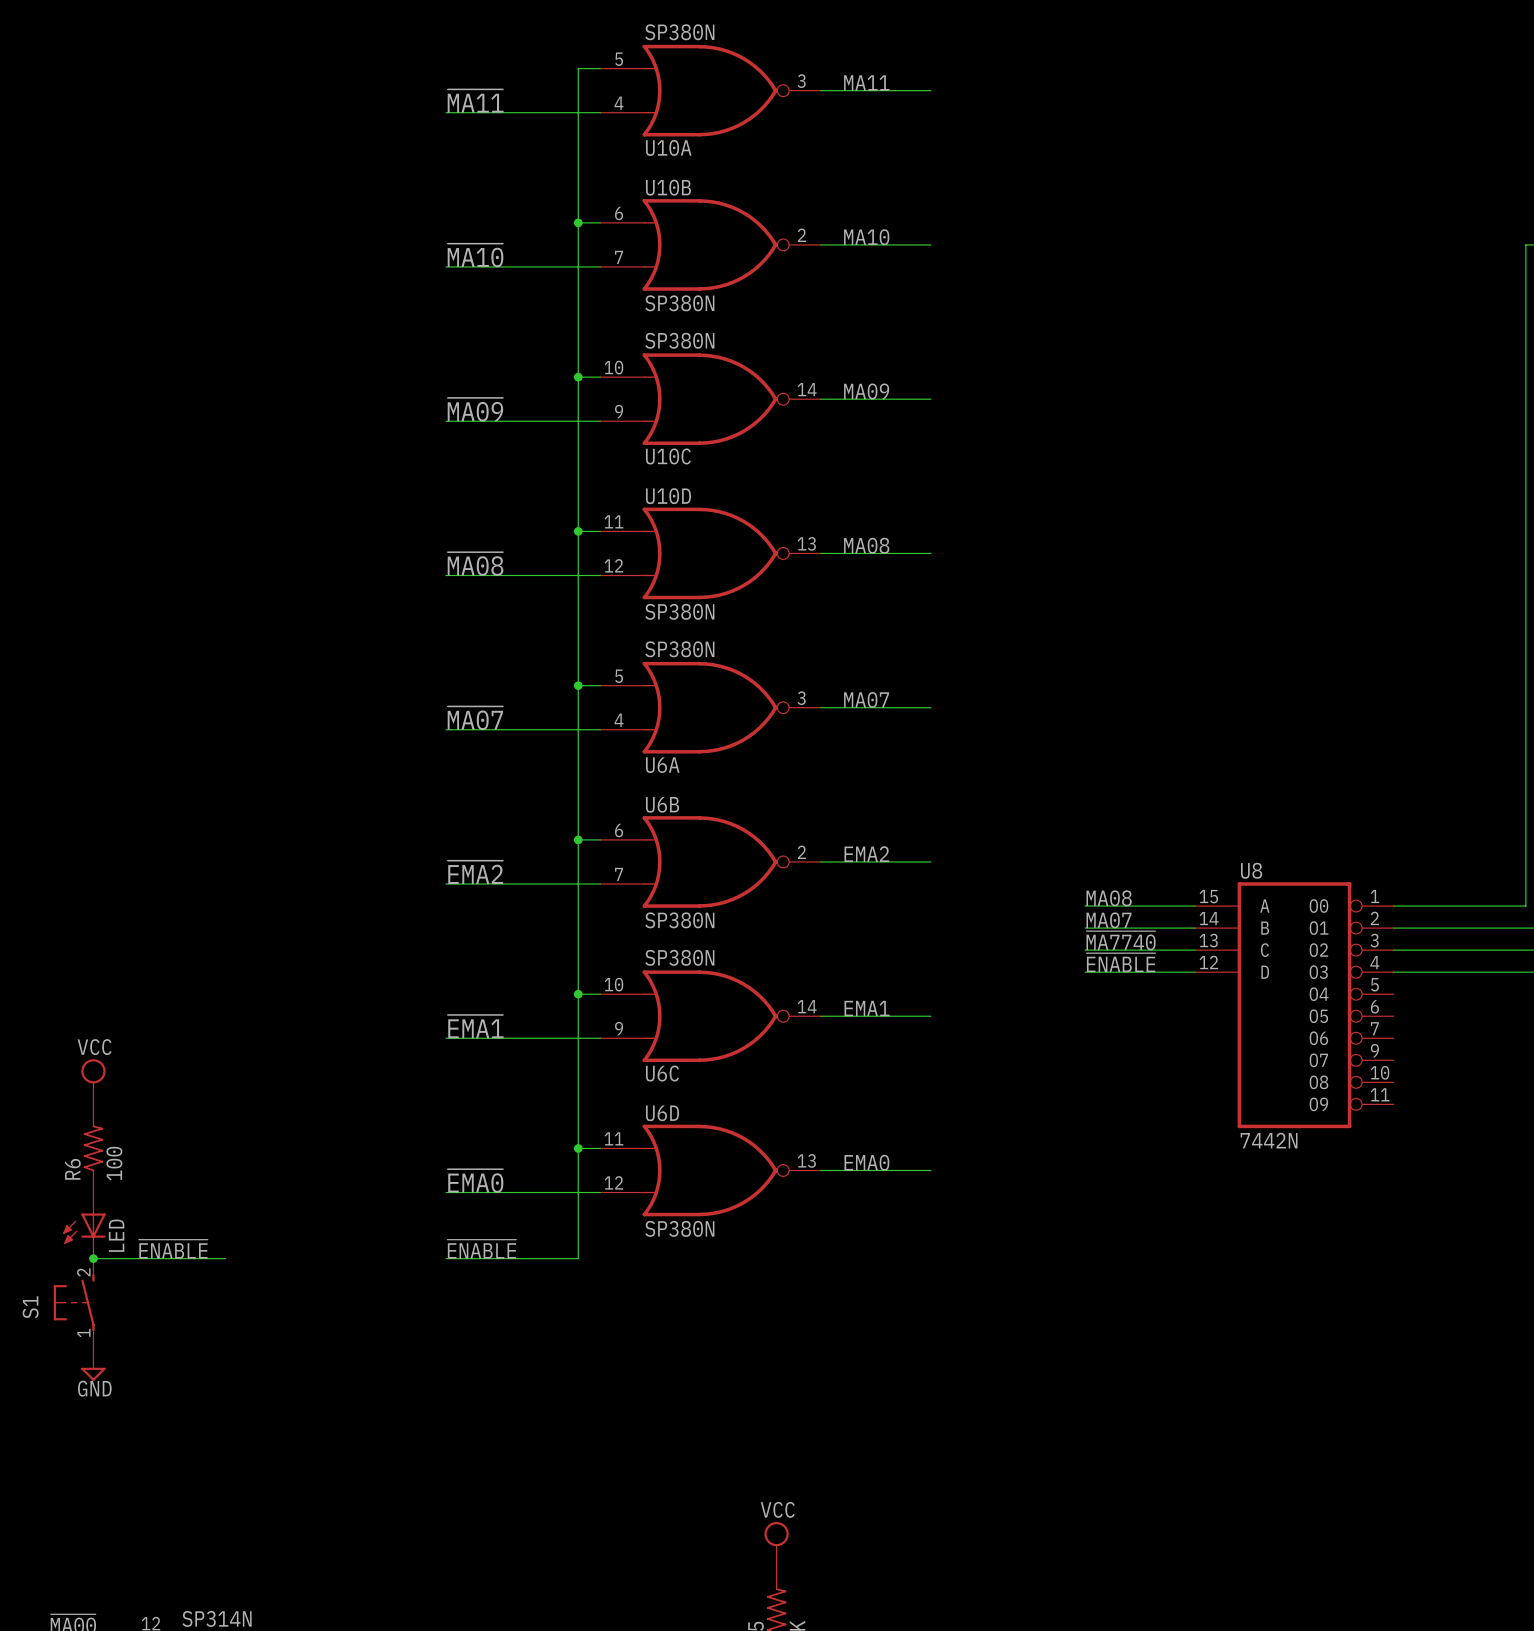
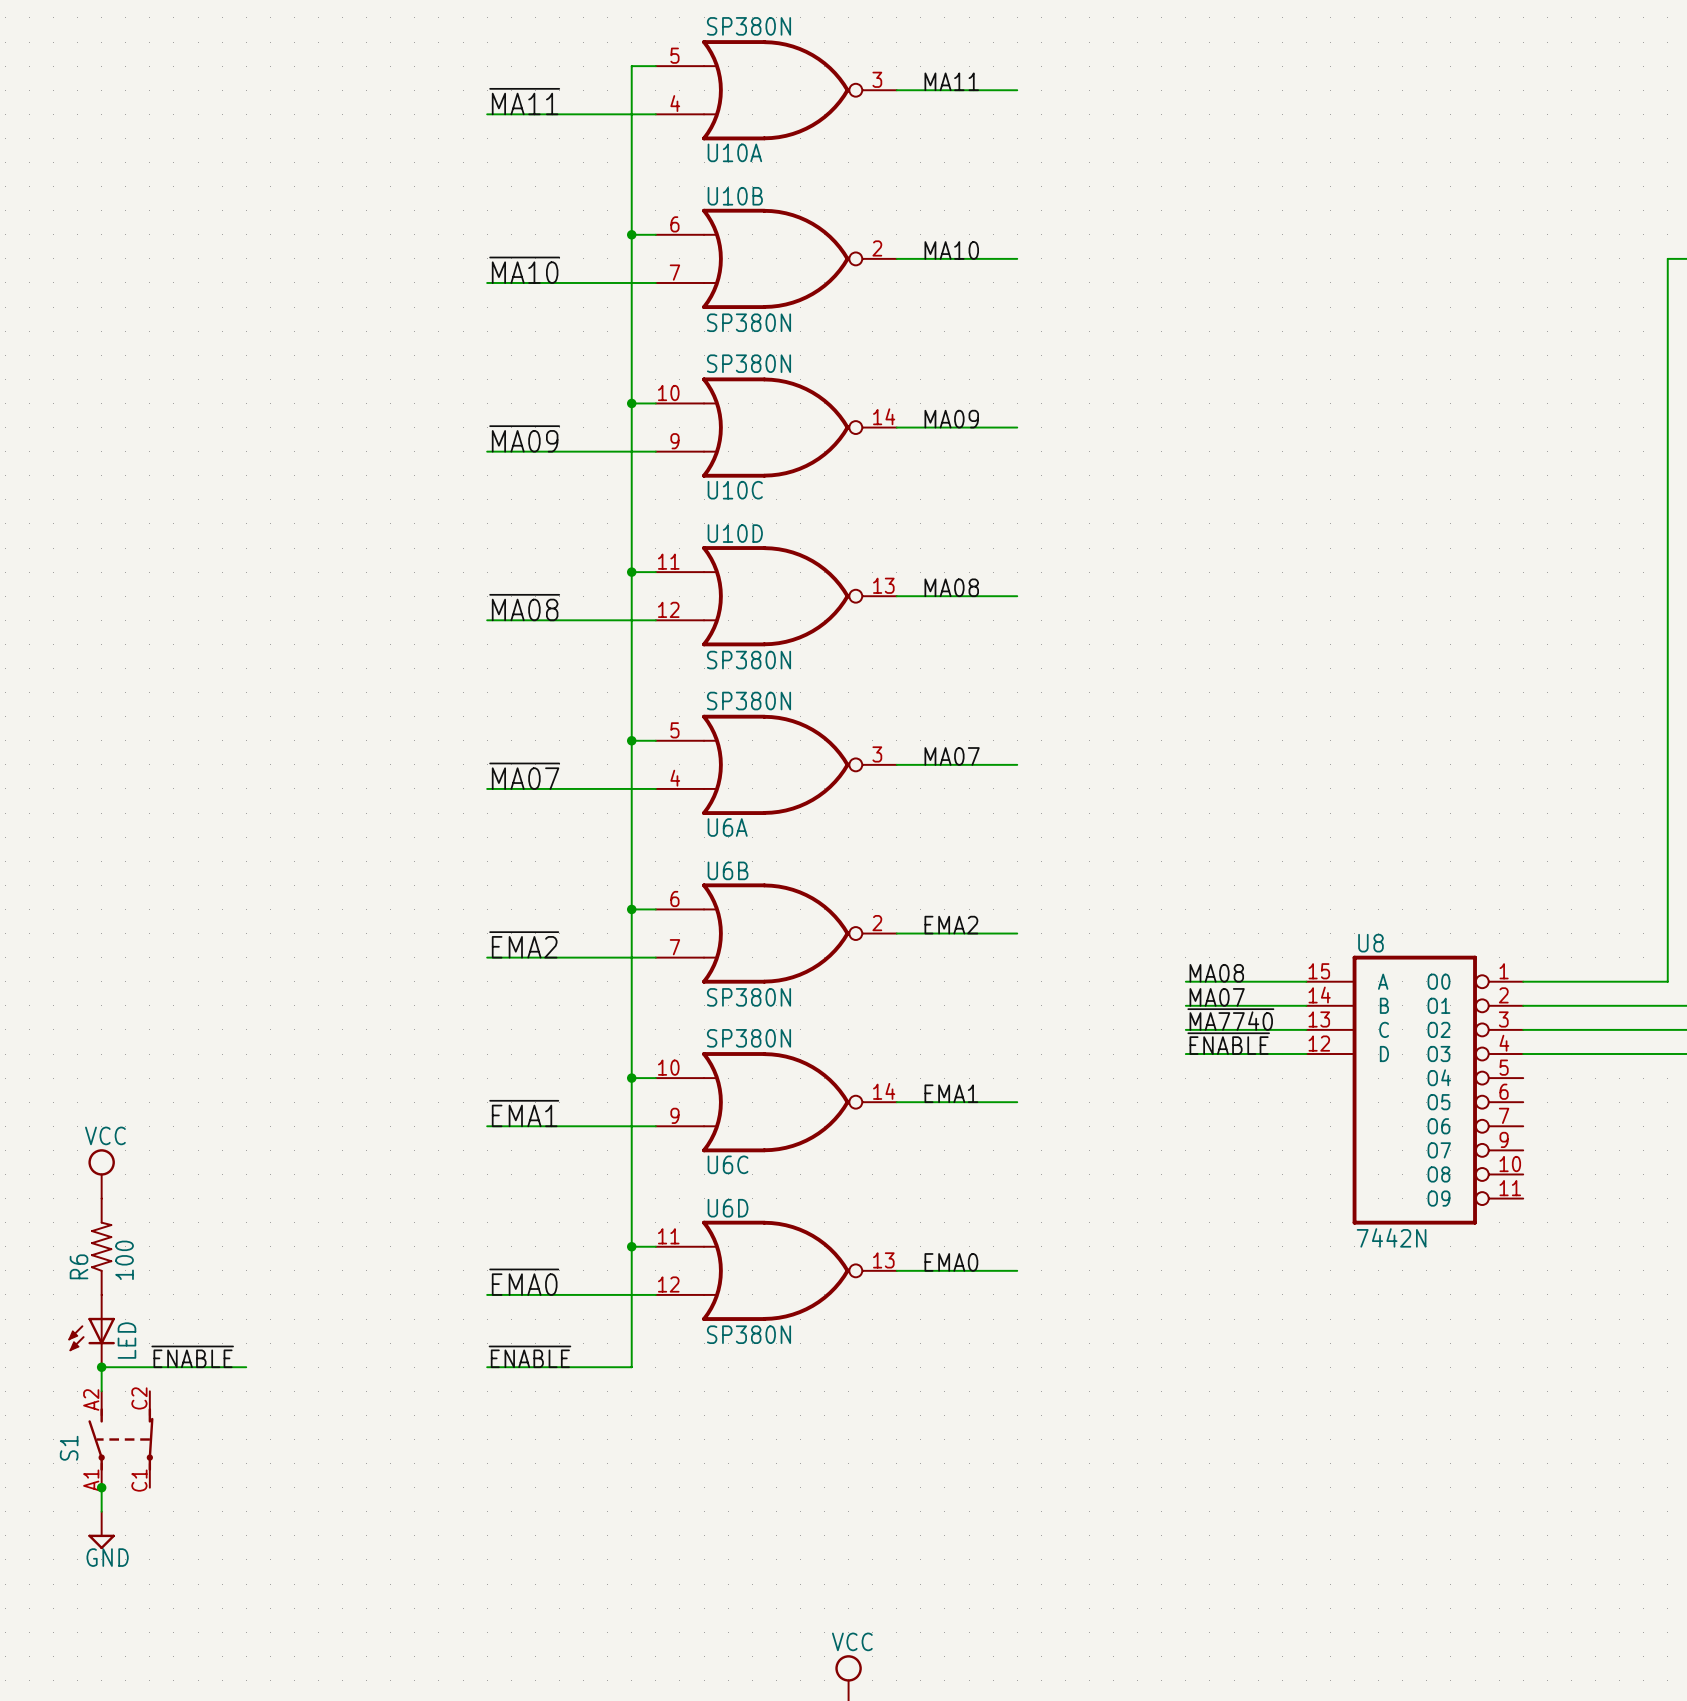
S1 symbol: [53, 1258, 95, 1347] -> [88, 1391, 154, 1488]
power symbol position: GND (93, 1363) -> GND (101, 1530)
wire: none -> (101, 1487) (101, 1511)
junction: none -> (101, 1487)

